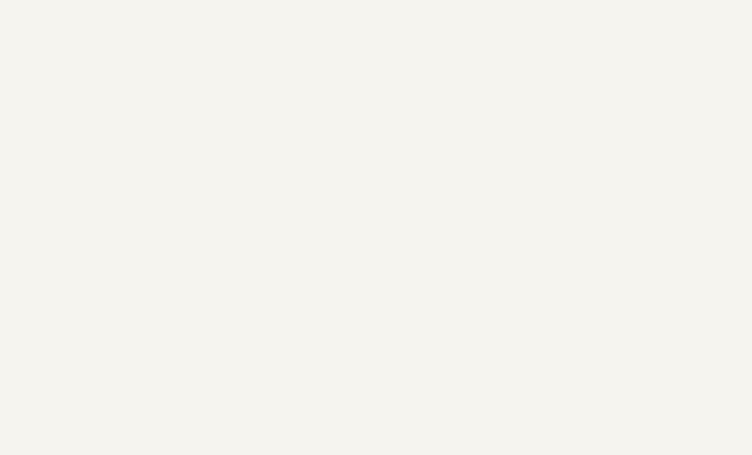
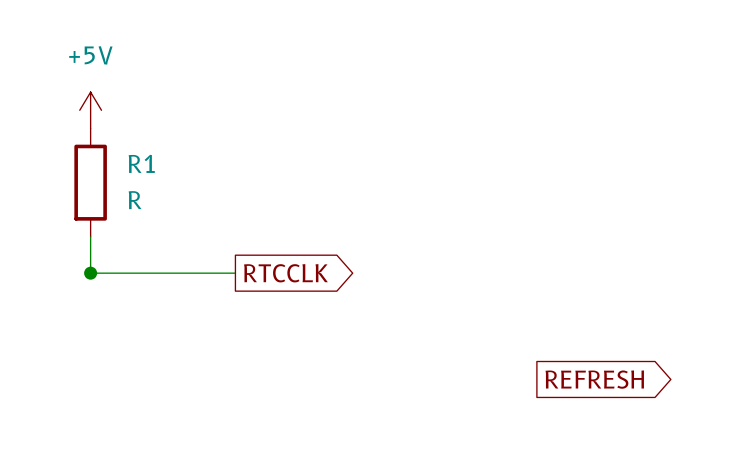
power symbol: none -> +5V (90, 110)
R1: none -> R (90, 182)
wire: none -> (90, 236) (90, 273) (235, 273)
junction: none -> (90, 273)
global label: none -> RTCCLK (285, 273)
global label: none -> REFRESH (594, 379)

